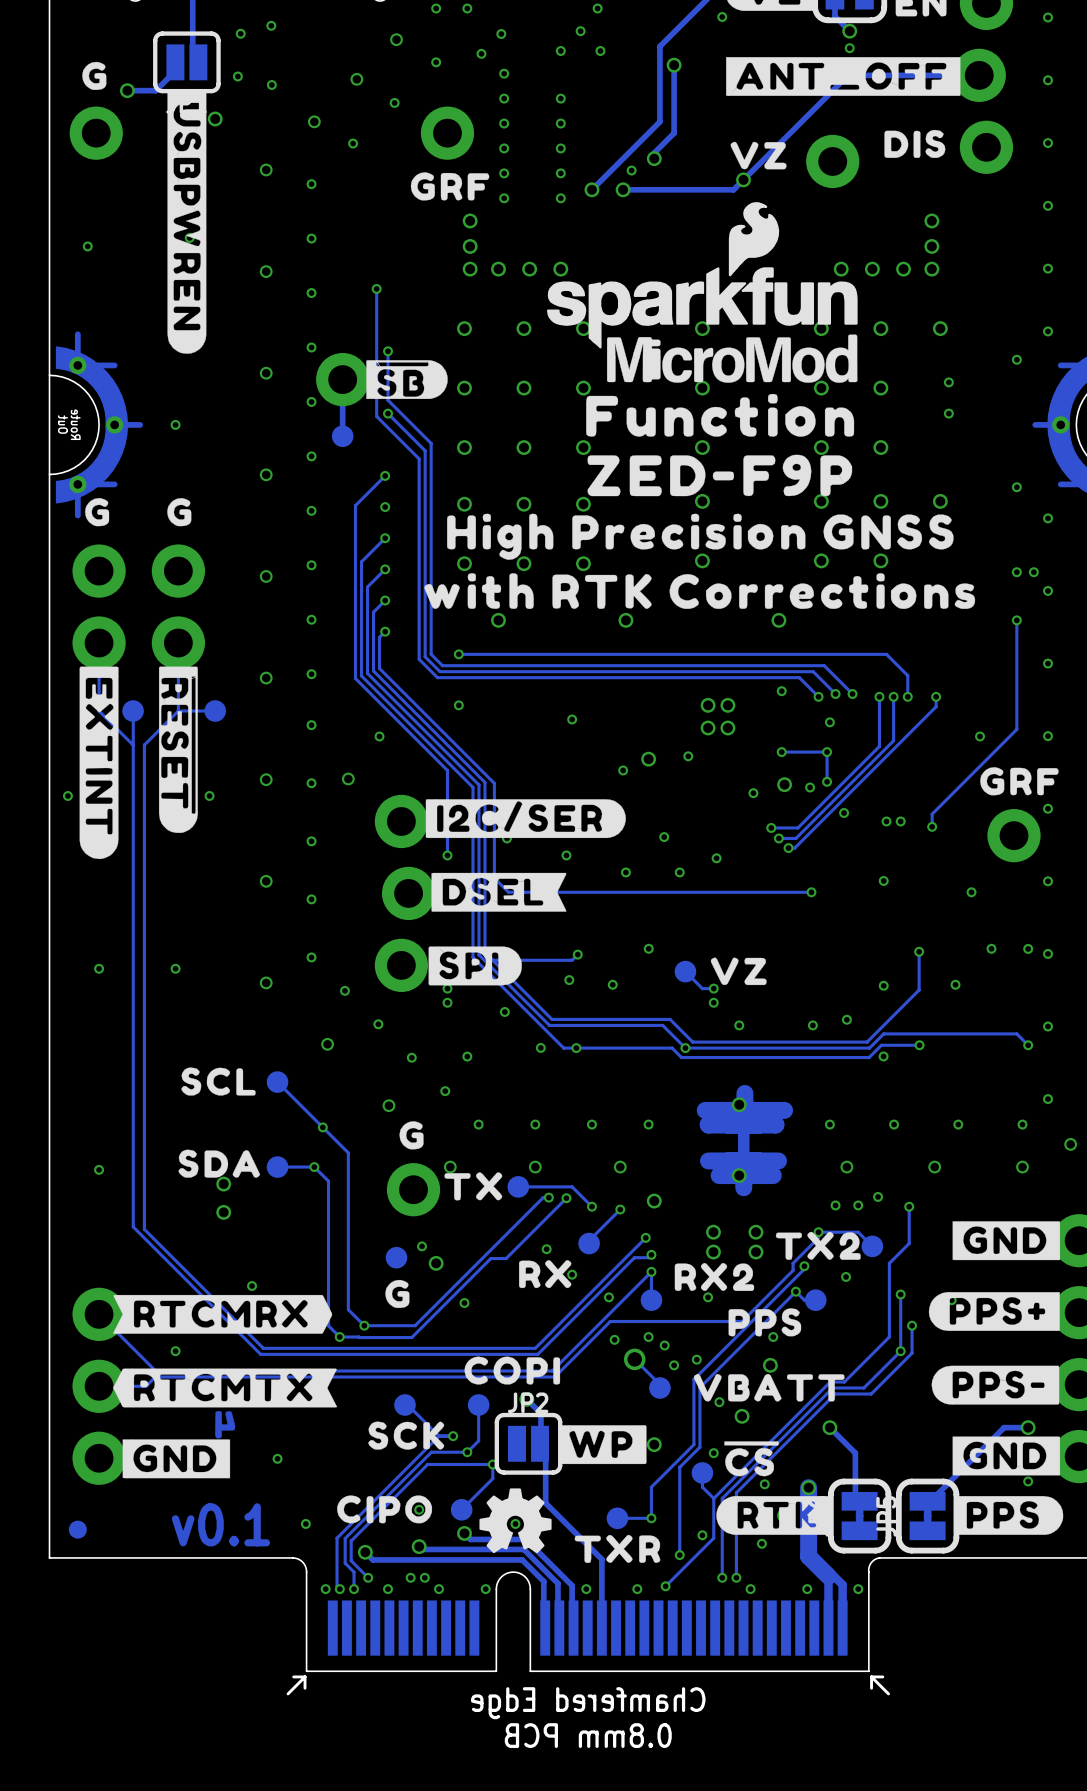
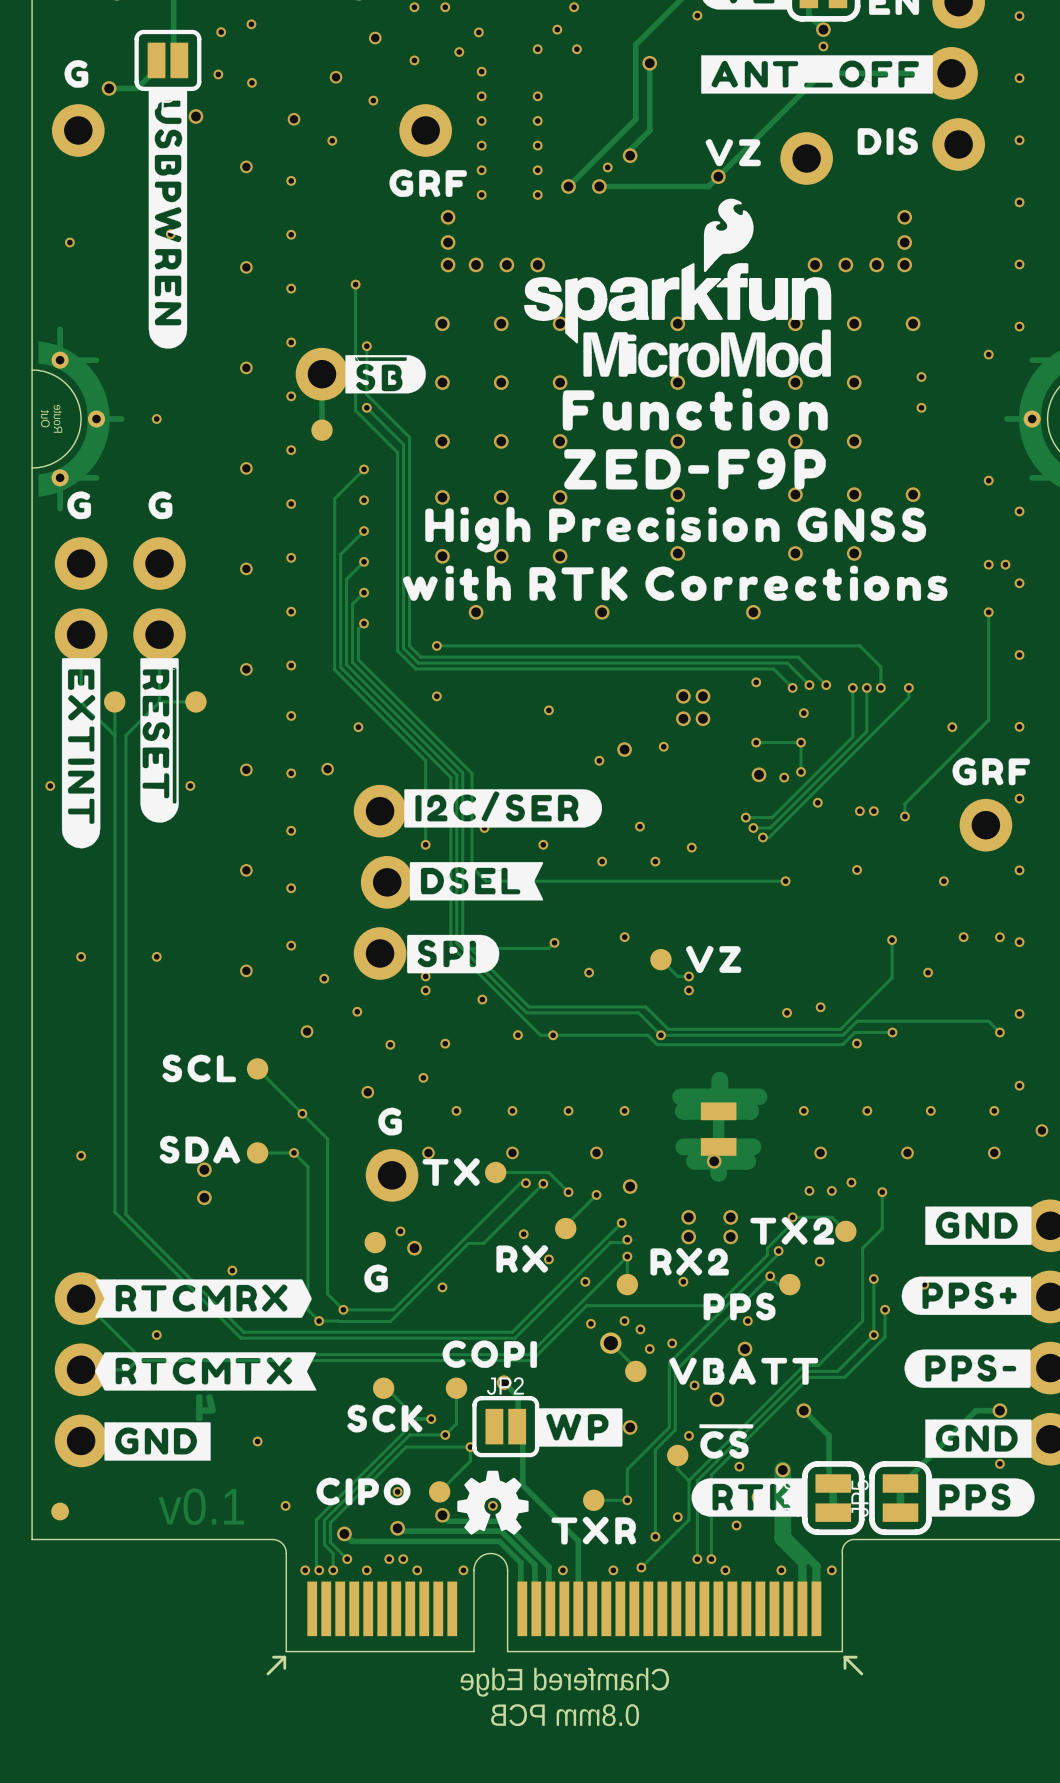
via: (753, 793) -> none
via: (569, 980) -> none
via: (883, 985) -> none
via: (739, 1025) -> none
via: (739, 1104) -> none

